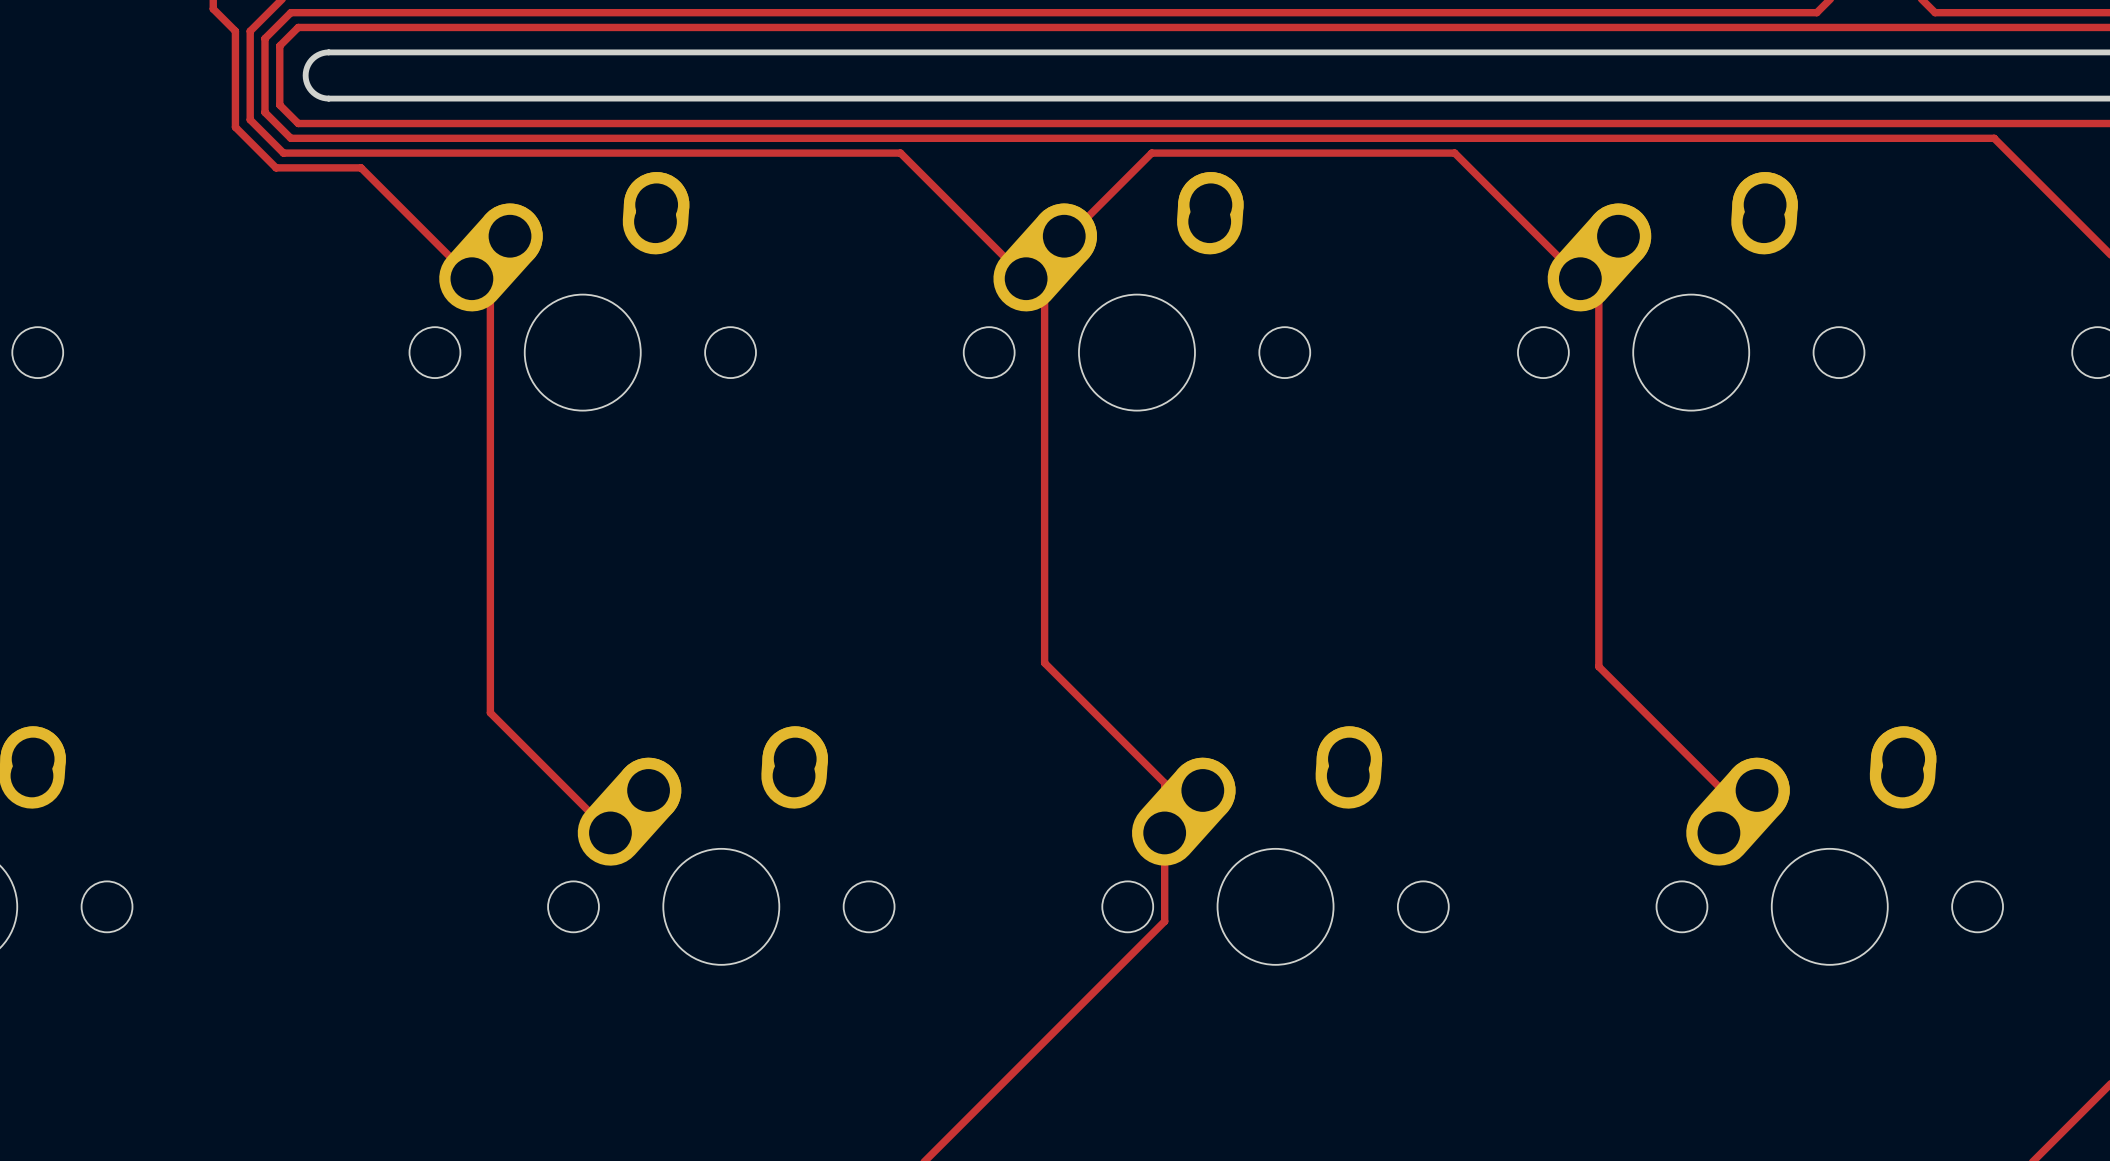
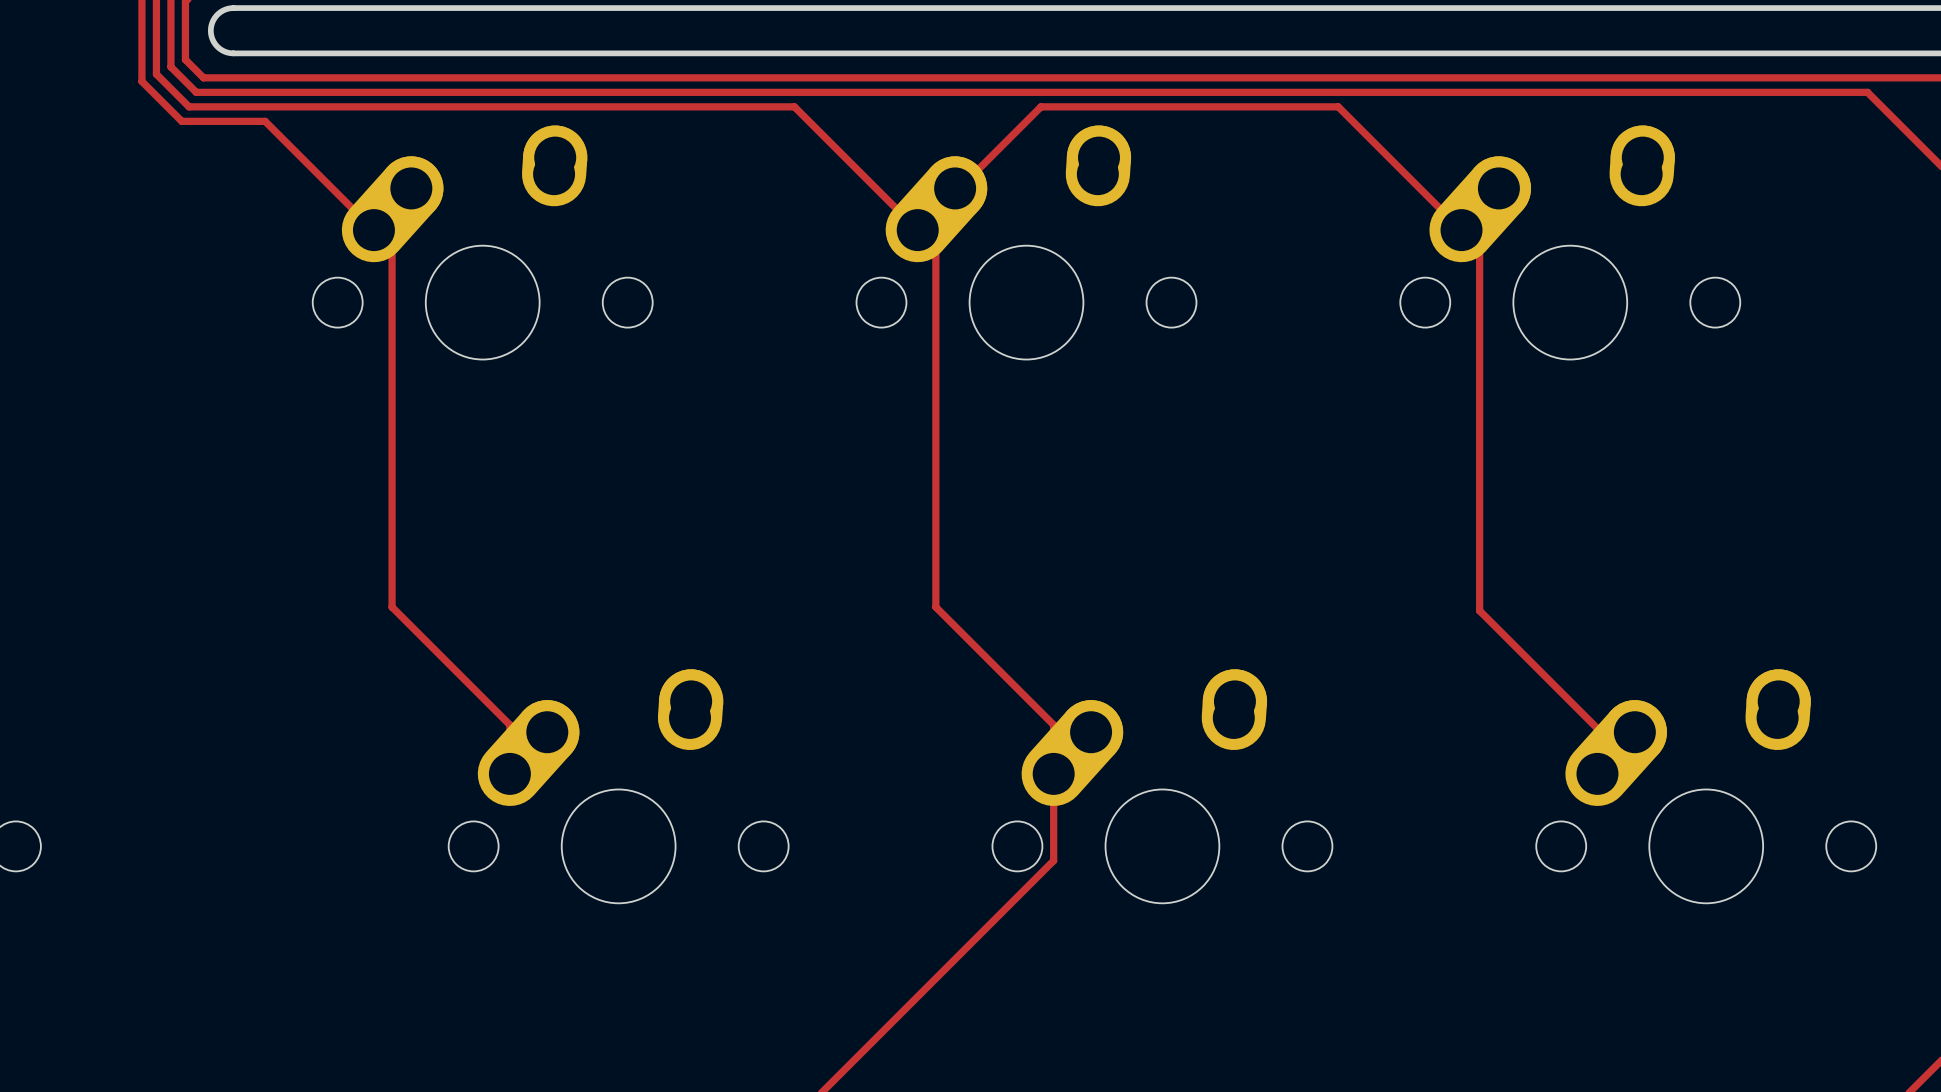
track: (490, 662) (490, 712) (610, 832) -> (392, 607) (509, 724) (509, 773)

